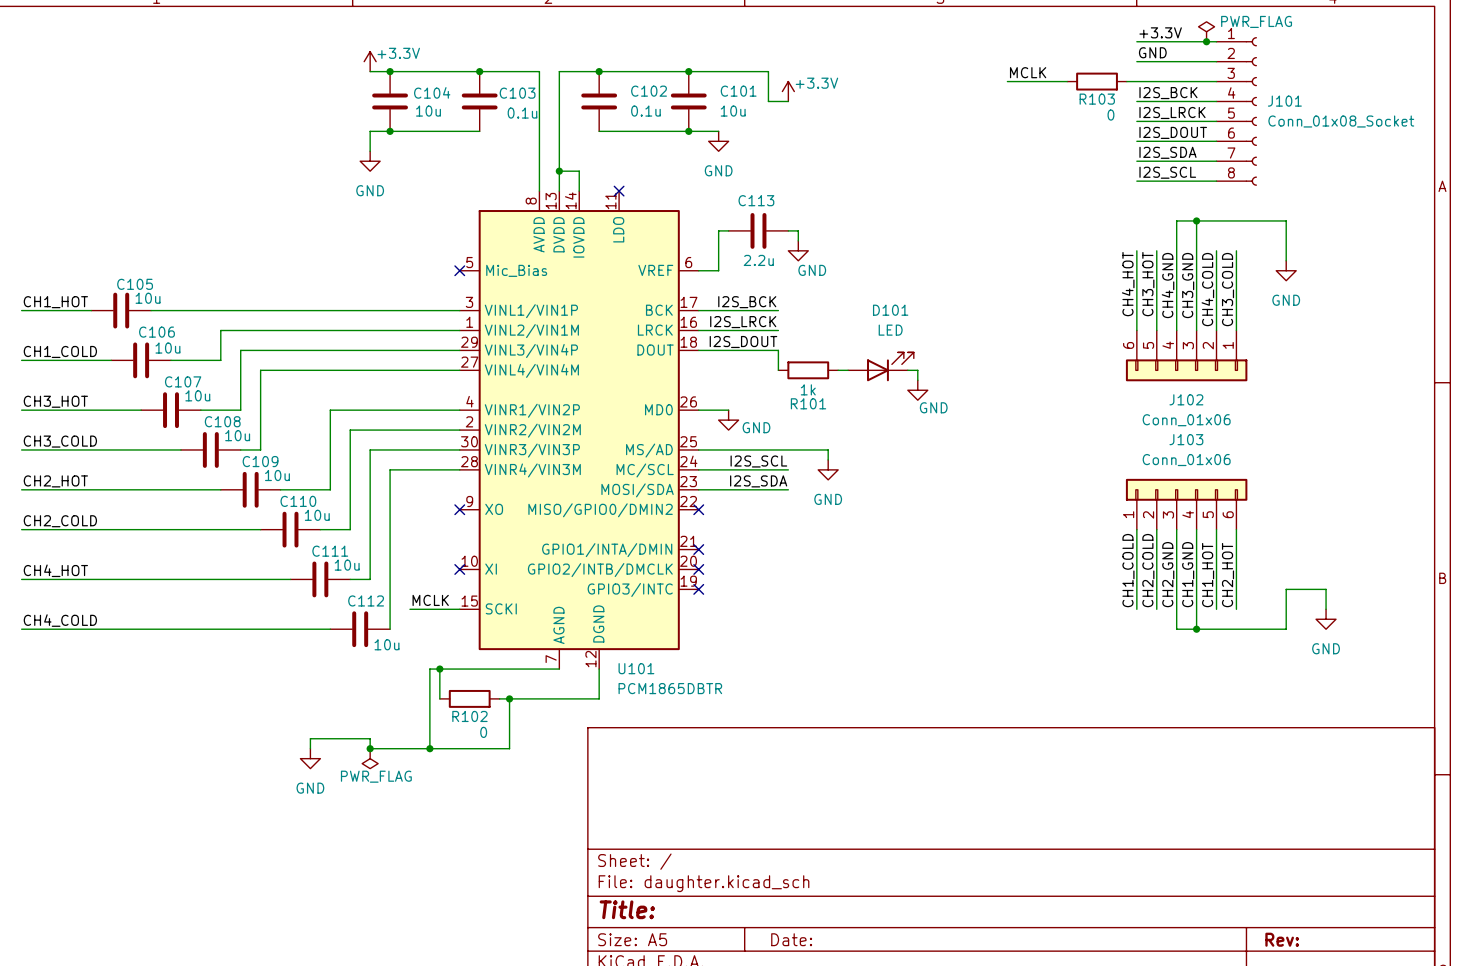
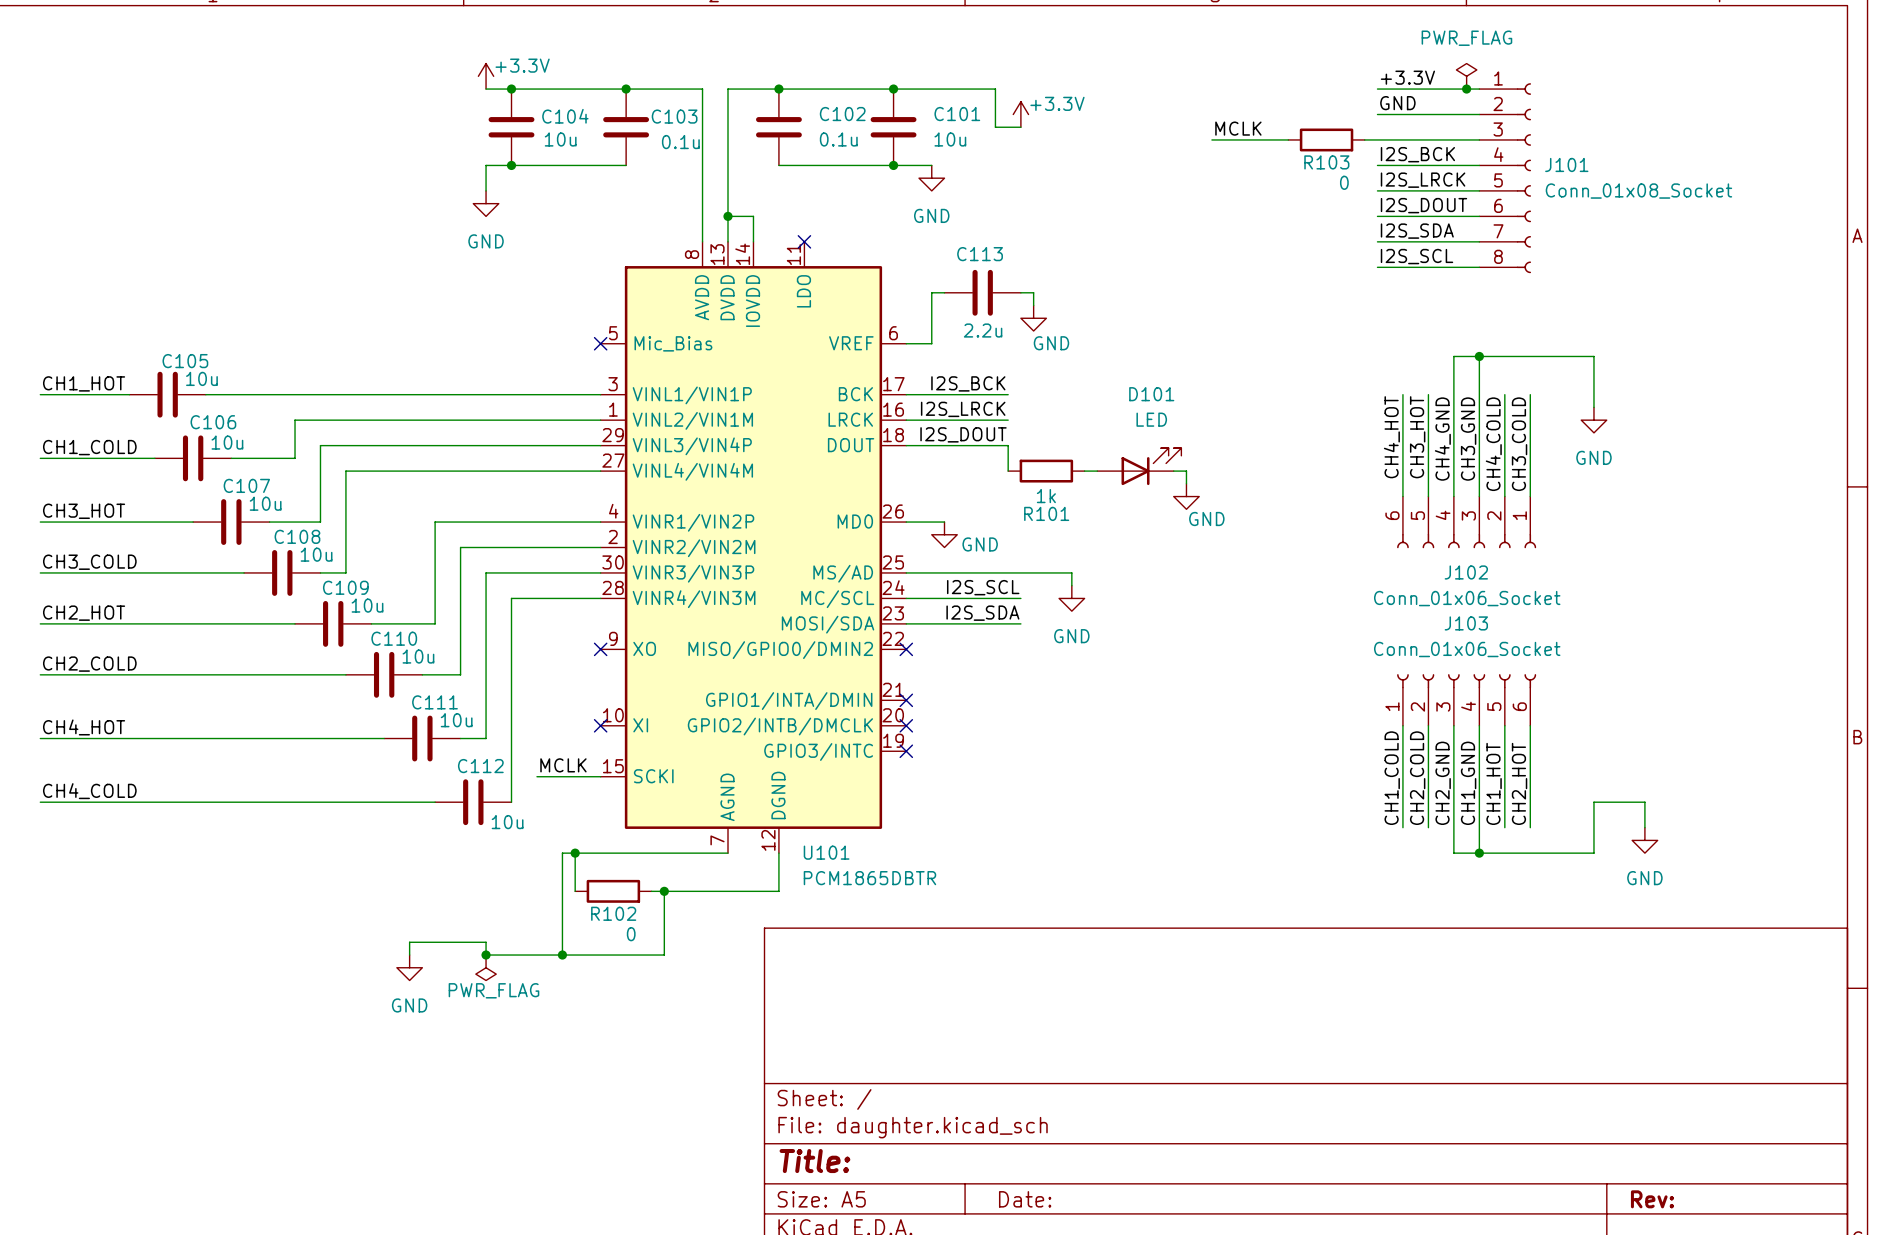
power symbol text position: PWR_FLAG (1256, 21) -> PWR_FLAG (1466, 38)
power symbol position: PWR_FLAG (1206, 31) -> PWR_FLAG (1466, 76)
label position: +3.3V (1160, 32) -> +3.3V (1407, 77)
wire: (1136, 41) (1216, 41) -> (1377, 89) (1479, 89)
junction: (1206, 41) -> none
label position: GND (1152, 52) -> GND (1397, 103)
wire: (1136, 61) (1216, 61) -> (1377, 114) (1479, 114)
junction: none -> (1466, 89)
label position: MCLK (1028, 72) -> MCLK (1238, 128)
wire: (1007, 81) (1067, 81) -> (1211, 139) (1288, 139)
R103 position: (1097, 81) -> (1326, 139)
wire: (1126, 81) (1216, 81) -> (1364, 139) (1479, 139)
label position: I2S_BCK (1168, 93) -> I2S_BCK (1417, 154)
wire: (1136, 101) (1216, 101) -> (1377, 165) (1479, 165)
J101 position: (1236, 111) -> (1505, 178)
label position: I2S_LRCK (1172, 112) -> I2S_LRCK (1423, 180)
wire: (1136, 121) (1216, 121) -> (1377, 190) (1479, 190)
label position: I2S_DOUT (1173, 132) -> I2S_DOUT (1423, 205)
wire: (1136, 141) (1216, 141) -> (1377, 216) (1479, 216)
label position: I2S_SDA (1167, 152) -> I2S_SDA (1417, 231)
wire: (1136, 161) (1216, 161) -> (1377, 241) (1479, 241)
label position: I2S_SCL (1167, 172) -> I2S_SCL (1417, 256)
wire: (1136, 181) (1216, 181) -> (1377, 267) (1479, 267)
wire: (1196, 220) (1196, 330) -> (1479, 356) (1479, 496)
junction: (1196, 220) -> none
wire: (1136, 250) (1136, 330) -> (1402, 394) (1402, 496)
wire: (1156, 250) (1156, 330) -> (1428, 394) (1428, 496)
wire: (1216, 250) (1216, 330) -> (1504, 394) (1504, 496)
wire: (1236, 250) (1236, 280) -> (1453, 496) (1453, 356) (1593, 356)
wire: (1286, 260) (1286, 220) (1176, 220) (1176, 330) -> none
power symbol position: GND (1286, 270) -> GND (1593, 420)
junction: none -> (1479, 356)
label position: CH4_HOT (1128, 284) -> CH4_HOT (1391, 437)
label position: CH3_HOT (1148, 284) -> CH3_HOT (1417, 437)
label position: CH4_GND (1168, 285) -> CH4_GND (1442, 439)
label position: CH3_GND (1188, 285) -> CH3_GND (1468, 439)
label position: CH4_COLD (1207, 289) -> CH4_COLD (1493, 444)
label position: CH3_COLD (1228, 289) -> CH3_COLD (1519, 444)
wire: none -> (1530, 394) (1530, 496)
J102 symbol: [1125, 330, 1248, 382] -> [1397, 496, 1537, 549]
J102 value: Conn_01x06 (1186, 420) -> Conn_01x06_Socket (1467, 598)
J103 value: Conn_01x06 (1186, 460) -> Conn_01x06_Socket (1467, 649)
J103 symbol: [1125, 478, 1248, 530] -> [1397, 674, 1537, 726]
wire: (1136, 529) (1136, 609) -> (1402, 725) (1402, 827)
wire: (1156, 529) (1156, 609) -> (1428, 725) (1428, 827)
wire: (1176, 529) (1176, 629) (1236, 629) -> (1453, 725) (1453, 853) (1593, 853) (1593, 802)
wire: (1196, 529) (1196, 629) -> (1479, 725) (1479, 853)
wire: (1216, 529) (1216, 609) -> (1504, 725) (1504, 827)
wire: (1236, 529) (1236, 609) -> (1530, 725) (1530, 827)
label position: CH1_COLD (1128, 570) -> CH1_COLD (1392, 778)
label position: CH2_COLD (1148, 570) -> CH2_COLD (1417, 778)
label position: CH2_GND (1168, 574) -> CH2_GND (1443, 783)
label position: CH1_GND (1188, 574) -> CH1_GND (1468, 783)
label position: CH1_HOT (1208, 575) -> CH1_HOT (1494, 783)
label position: CH2_HOT (1228, 575) -> CH2_HOT (1519, 783)
wire: (1326, 609) (1326, 589) (1286, 589) (1286, 629) (1276, 629) -> (1644, 827) (1644, 802)
power symbol position: GND (1326, 619) -> GND (1644, 840)
junction: (1196, 629) -> none
junction: none -> (1479, 853)

